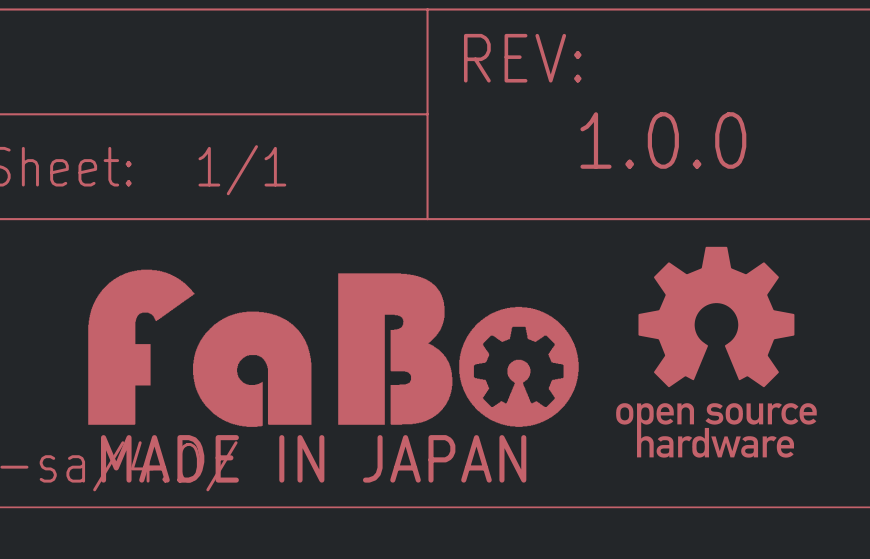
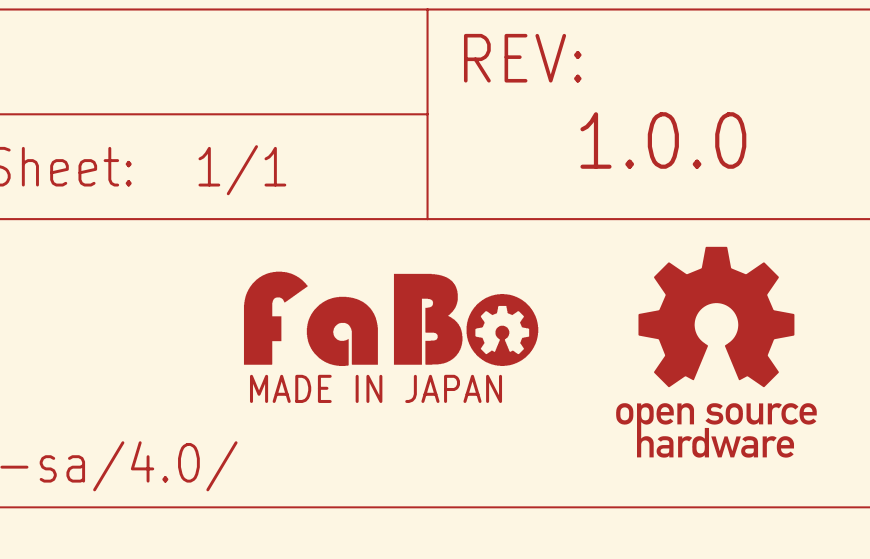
part: none -> (391, 318)
part: (333, 348) -> none

